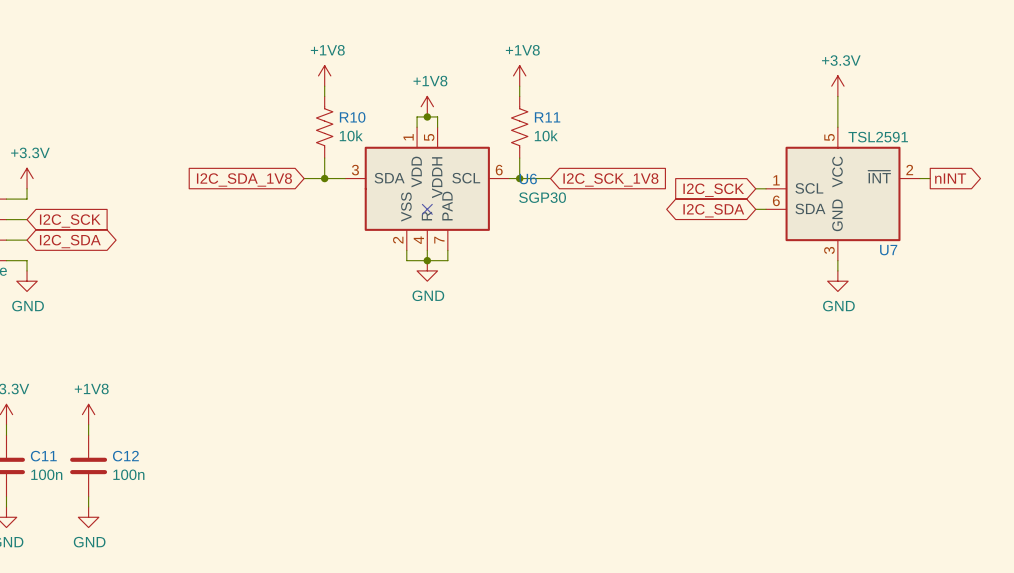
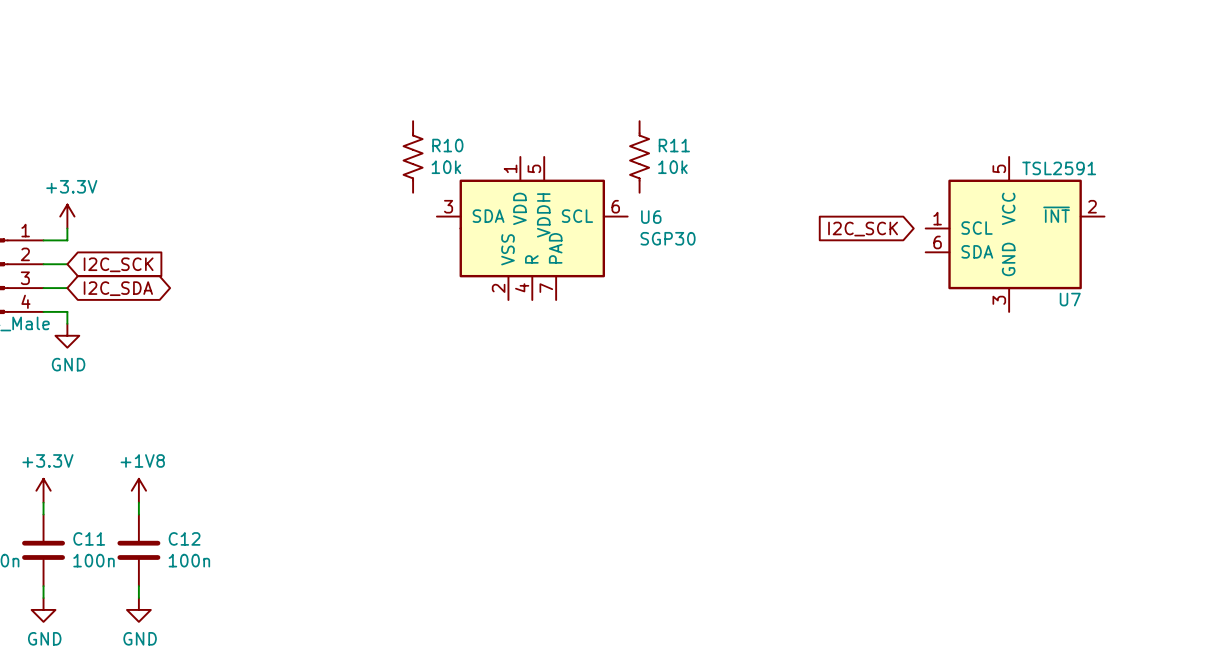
power symbol: +1V8 (324, 75) -> none
power symbol: +1V8 (519, 75) -> none
wire: (324, 86) (324, 96) -> none
wire: (519, 86) (519, 96) -> none
power symbol: +3.3V (837, 86) -> none
wire: (837, 96) (837, 127) -> none
power symbol: +1V8 (427, 106) -> none
junction: (427, 116) -> none
wire: (417, 127) (417, 116) (437, 116) (437, 127) -> none
wire: (324, 158) (324, 178) -> none
wire: (519, 158) (519, 178) -> none
wire: (304, 178) (345, 178) -> none
junction: (324, 178) -> none
wire: (509, 178) (550, 178) -> none
junction: (519, 178) -> none
wire: (919, 178) (930, 178) -> none
global label: nINT (950, 178) -> none
global label: I2C_SDA_1V8 (244, 179) -> none
global label: I2C_SCK_1V8 (610, 179) -> none
wire: (755, 188) (766, 188) -> none
no-connect mark: (427, 209) -> none
wire: (755, 209) (766, 209) -> none
global label: I2C_SDA (713, 210) -> none
wire: (406, 250) (406, 260) (447, 260) (447, 250) -> none
wire: (427, 250) (427, 260) -> none
junction: (427, 260) -> none
wire: (837, 260) (837, 270) -> none
power symbol: GND (427, 270) -> none
power symbol: GND (837, 281) -> none

